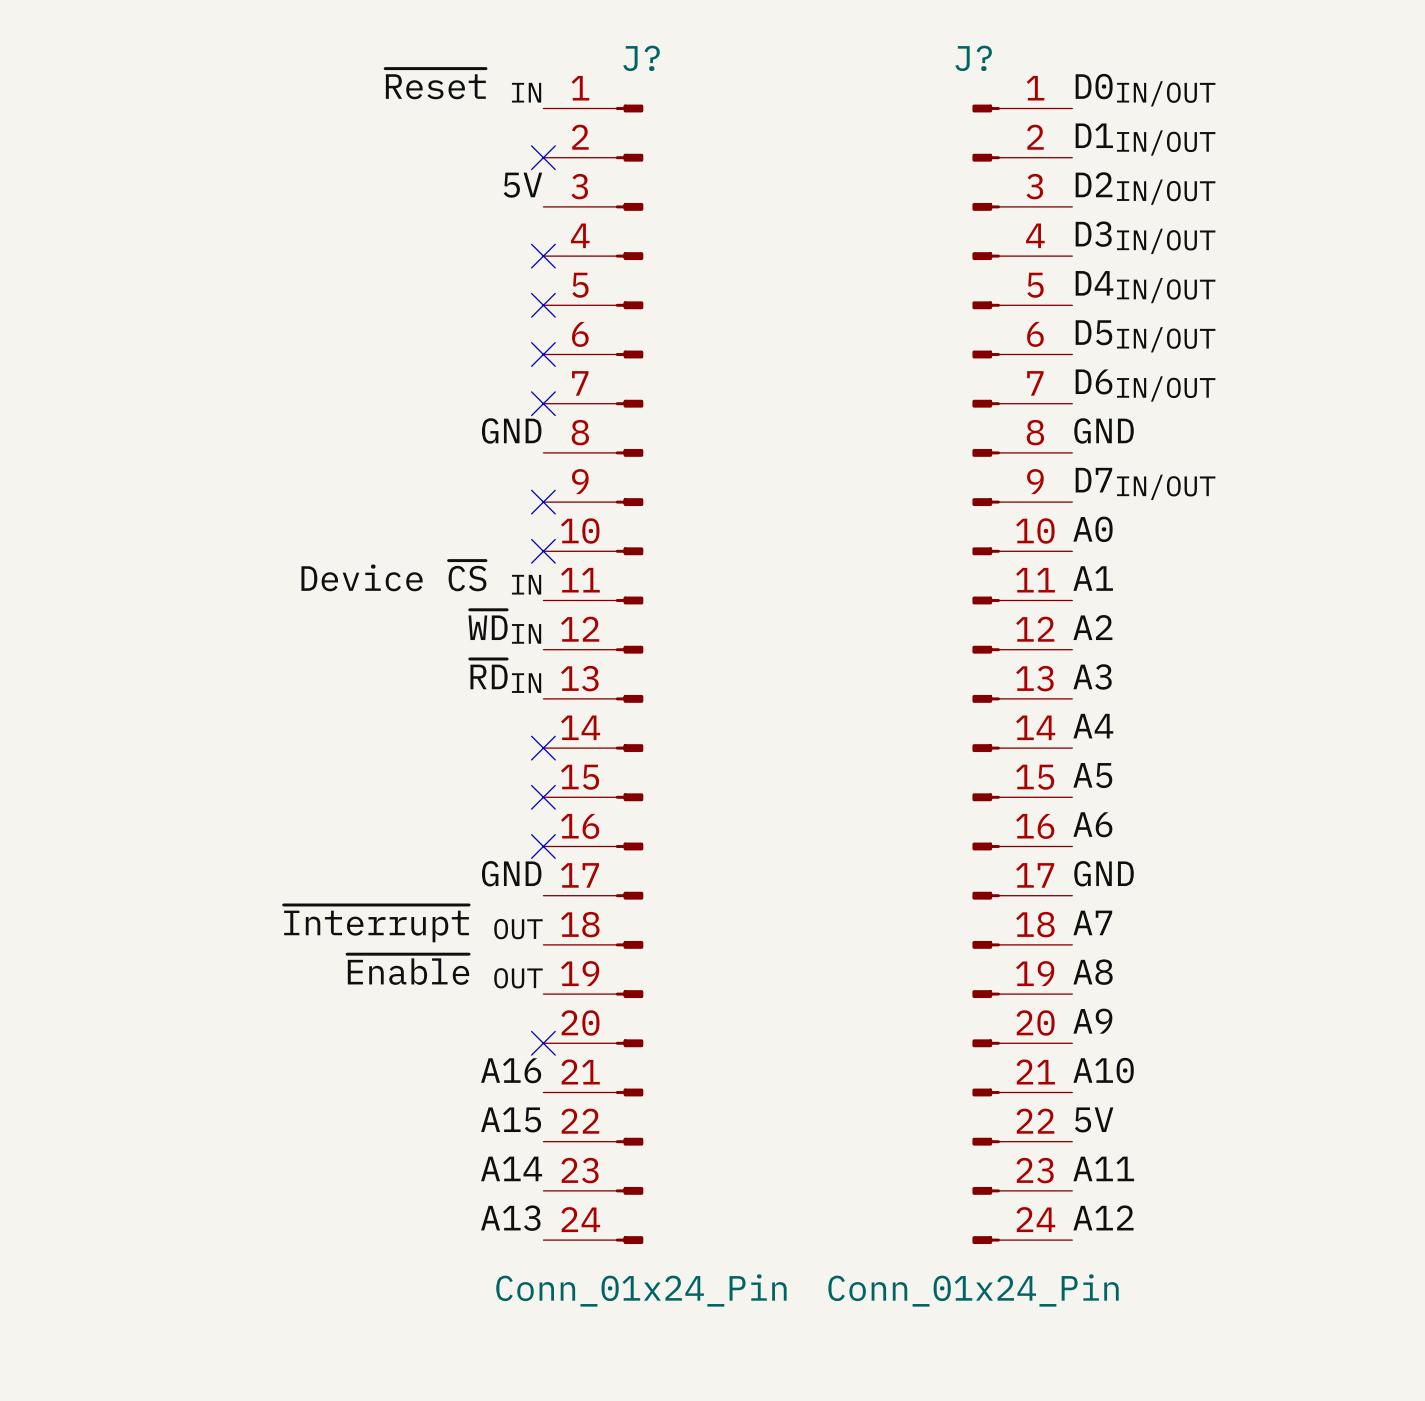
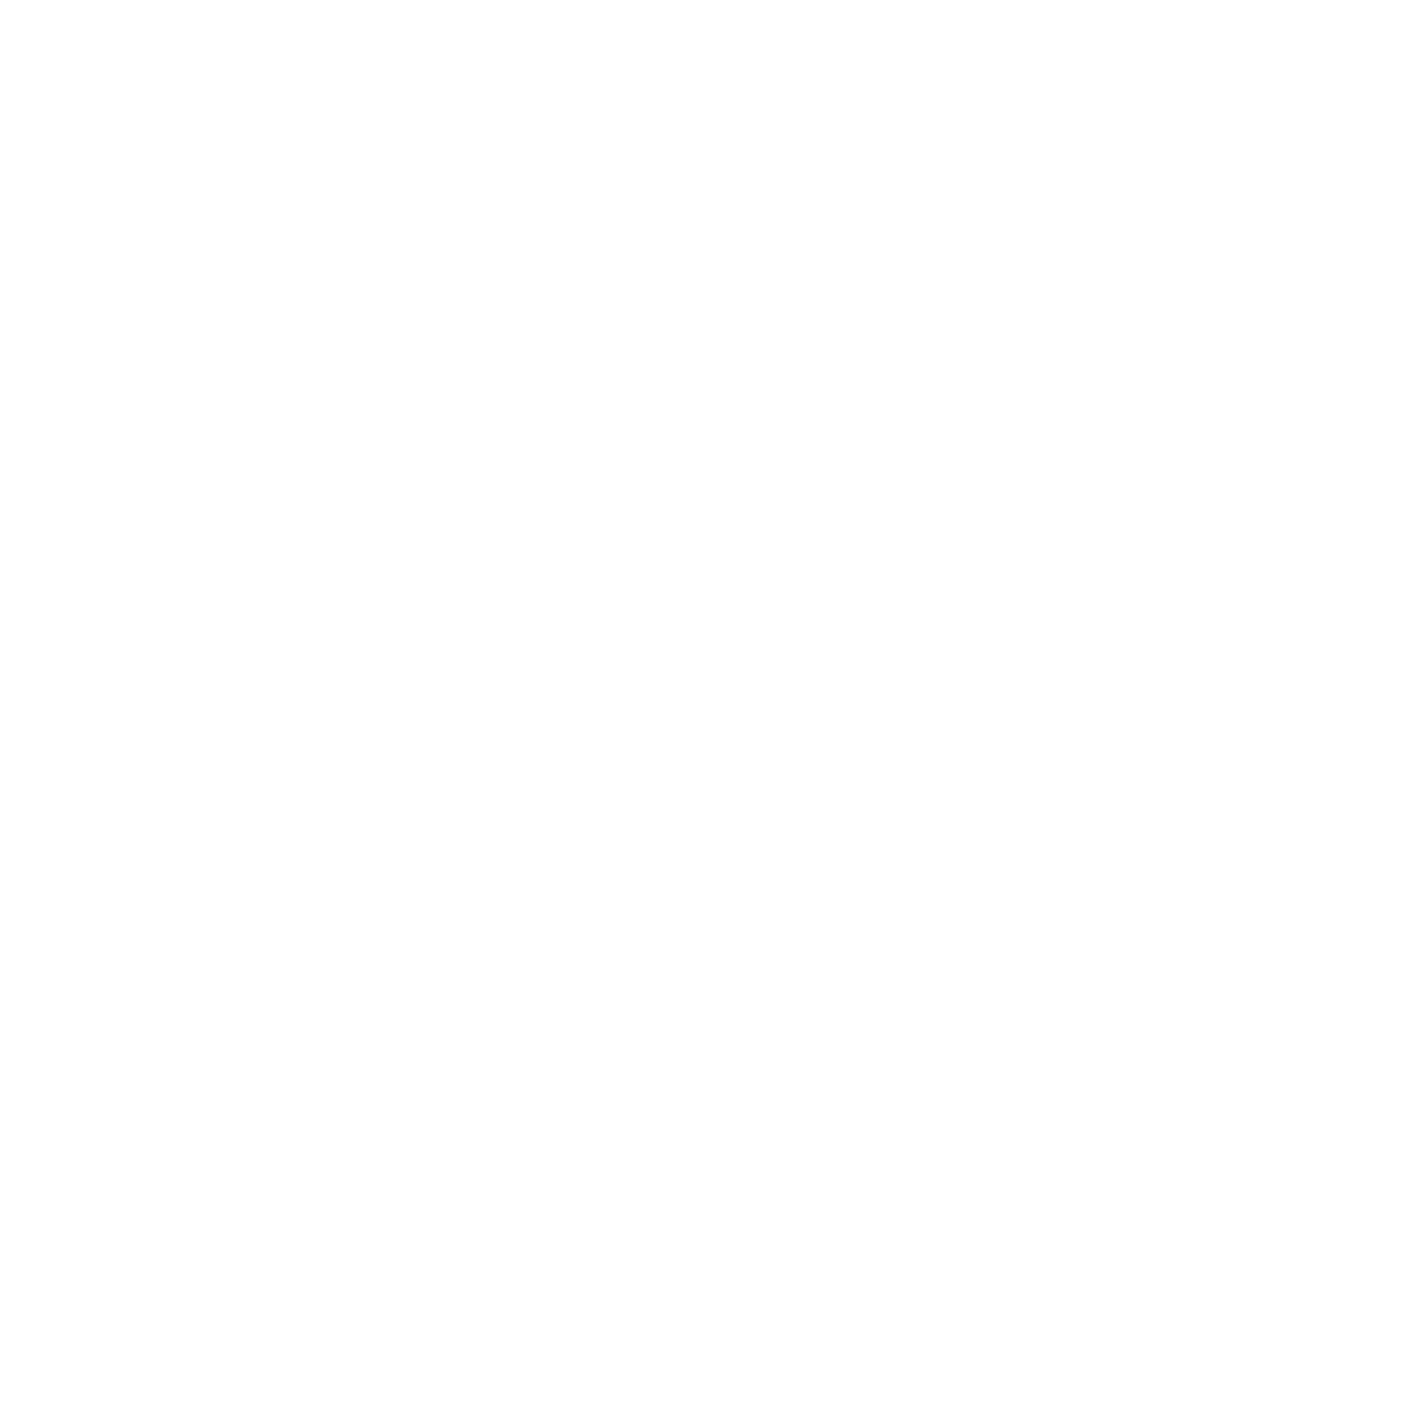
label: ~{Reset} IN (463, 85) -> none
label: D0IN/OUT (1145, 90) -> none
label: D1IN/OUT (1145, 139) -> none
no-connect mark: (543, 157) -> none
label: 5V (522, 185) -> none
label: D2IN/OUT (1145, 188) -> none
label: D3IN/OUT (1145, 237) -> none
no-connect mark: (543, 256) -> none
label: D4IN/OUT (1145, 287) -> none
no-connect mark: (543, 305) -> none
label: D5IN/OUT (1145, 336) -> none
no-connect mark: (543, 354) -> none
label: D6IN/OUT (1145, 385) -> none
no-connect mark: (543, 403) -> none
label: GND (511, 430) -> none
label: GND (1104, 430) -> none
label: D7IN/OUT (1145, 483) -> none
no-connect mark: (543, 502) -> none
label: A0 (1093, 529) -> none
no-connect mark: (543, 551) -> none
label: Device ~{CS} IN (421, 577) -> none
label: A1 (1093, 578) -> none
label: ~{WD}IN (504, 626) -> none
label: A2 (1092, 627) -> none
J?: Conn_01x24_Pin (593, 674) -> none
J?: Conn_01x24_Pin (1022, 674) -> none
label: ~{RD}IN (505, 675) -> none
label: A3 (1092, 676) -> none
label: A4 (1093, 726) -> none
no-connect mark: (543, 748) -> none
label: A5 (1092, 775) -> none
no-connect mark: (543, 797) -> none
label: A6 (1092, 824) -> none
no-connect mark: (543, 846) -> none
label: GND (511, 873) -> none
label: GND (1104, 873) -> none
label: A7 (1092, 922) -> none
label: ~{Interrupt} OUT (413, 923) -> none
label: ~{Enable} OUT (444, 971) -> none
label: A8 (1093, 972) -> none
label: A9 (1092, 1021) -> none
no-connect mark: (543, 1043) -> none
label: A16 (511, 1070) -> none
label: A10 (1103, 1070) -> none
label: A15 (511, 1119) -> none
label: 5V (1094, 1119) -> none
label: A14 (511, 1168) -> none
label: A11 (1103, 1168) -> none
label: A12 (1103, 1217) -> none
label: A13 (510, 1218) -> none

